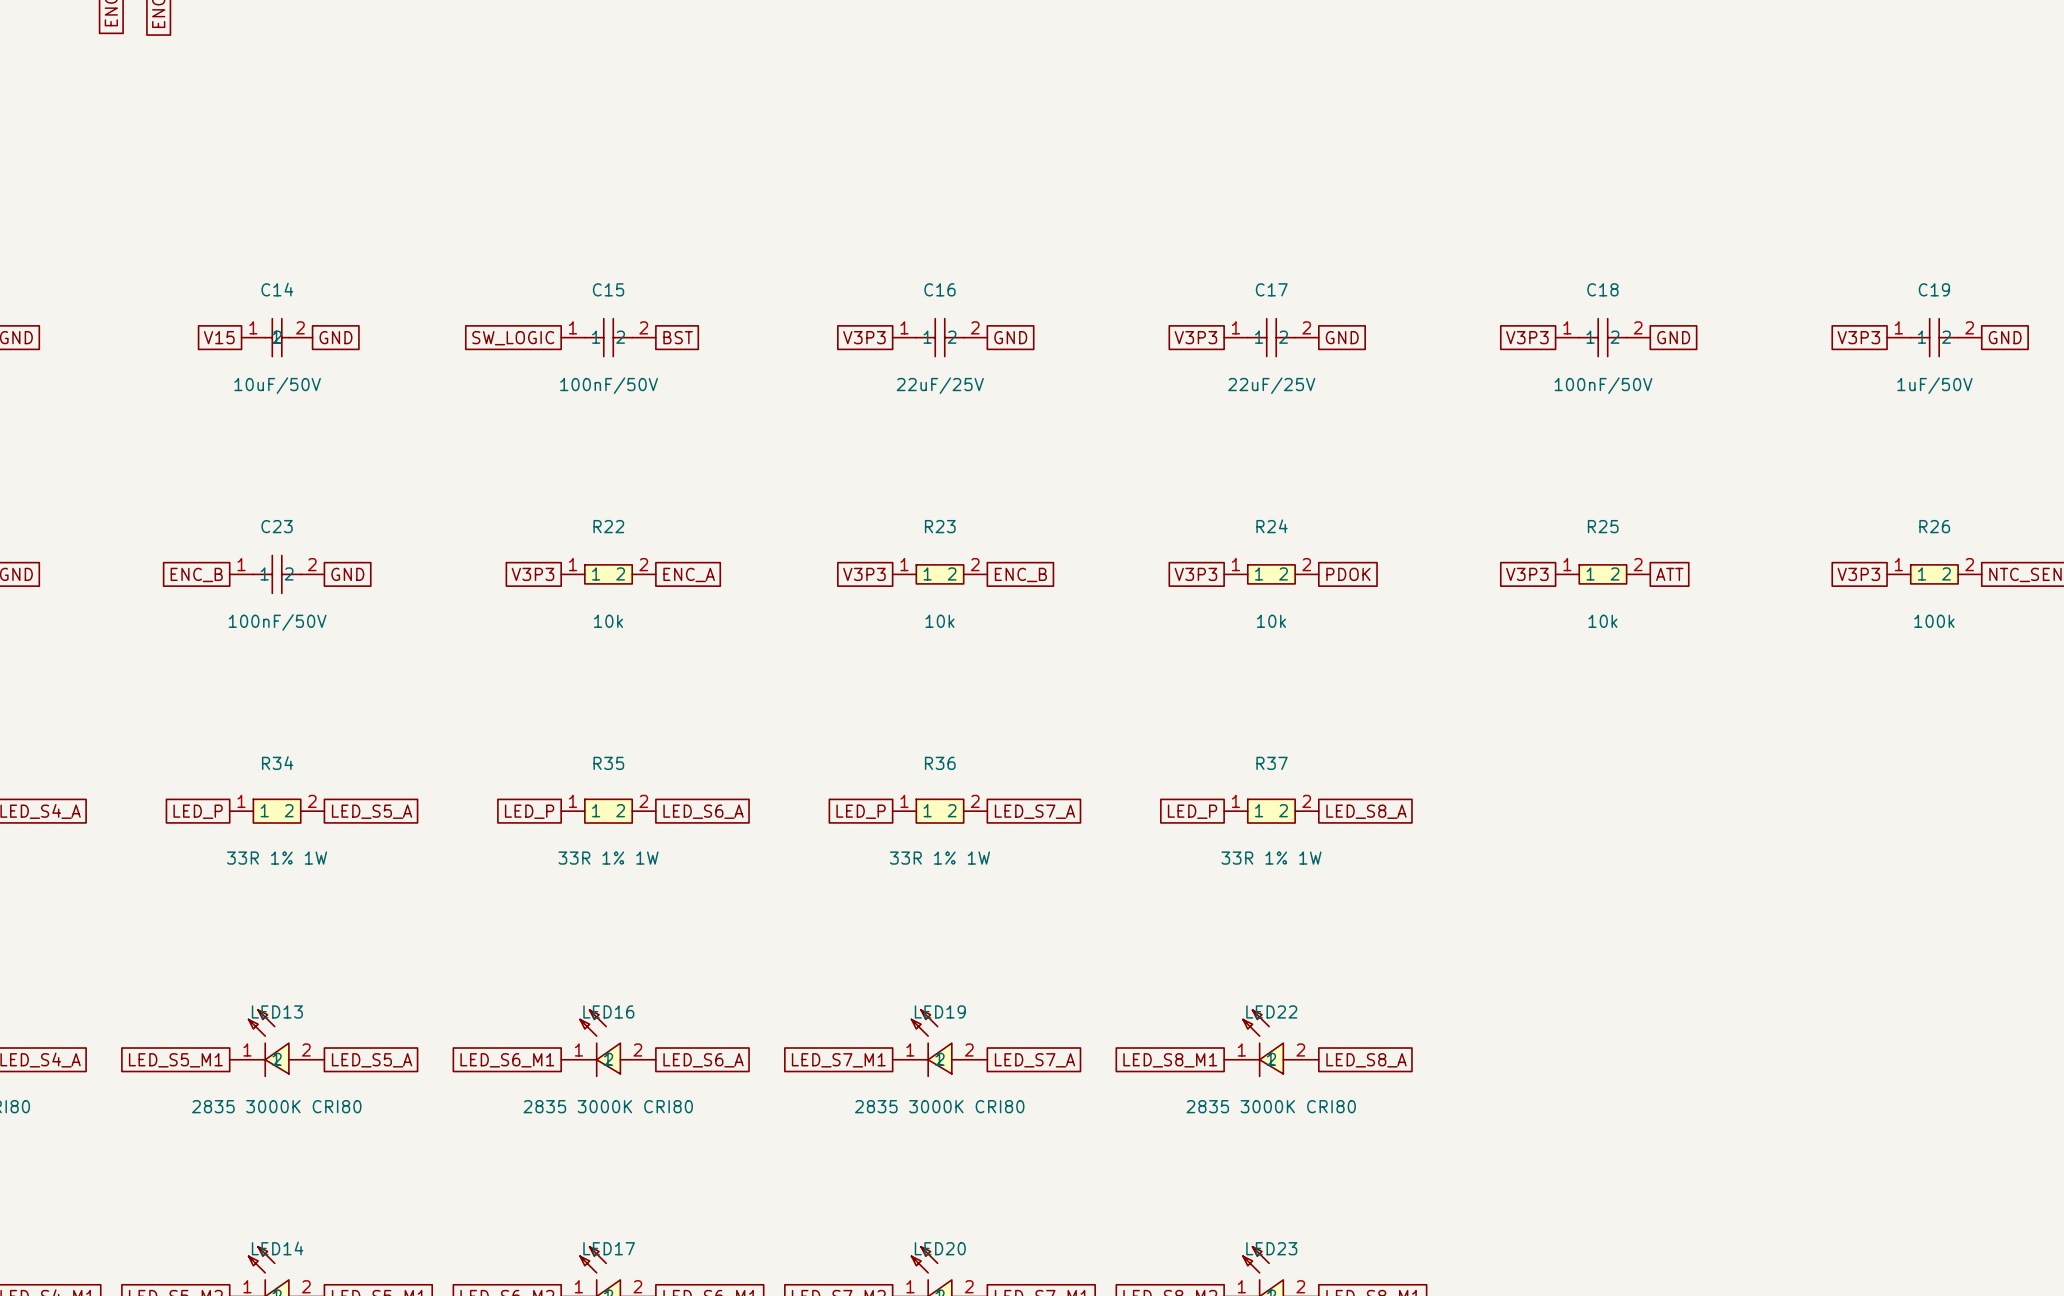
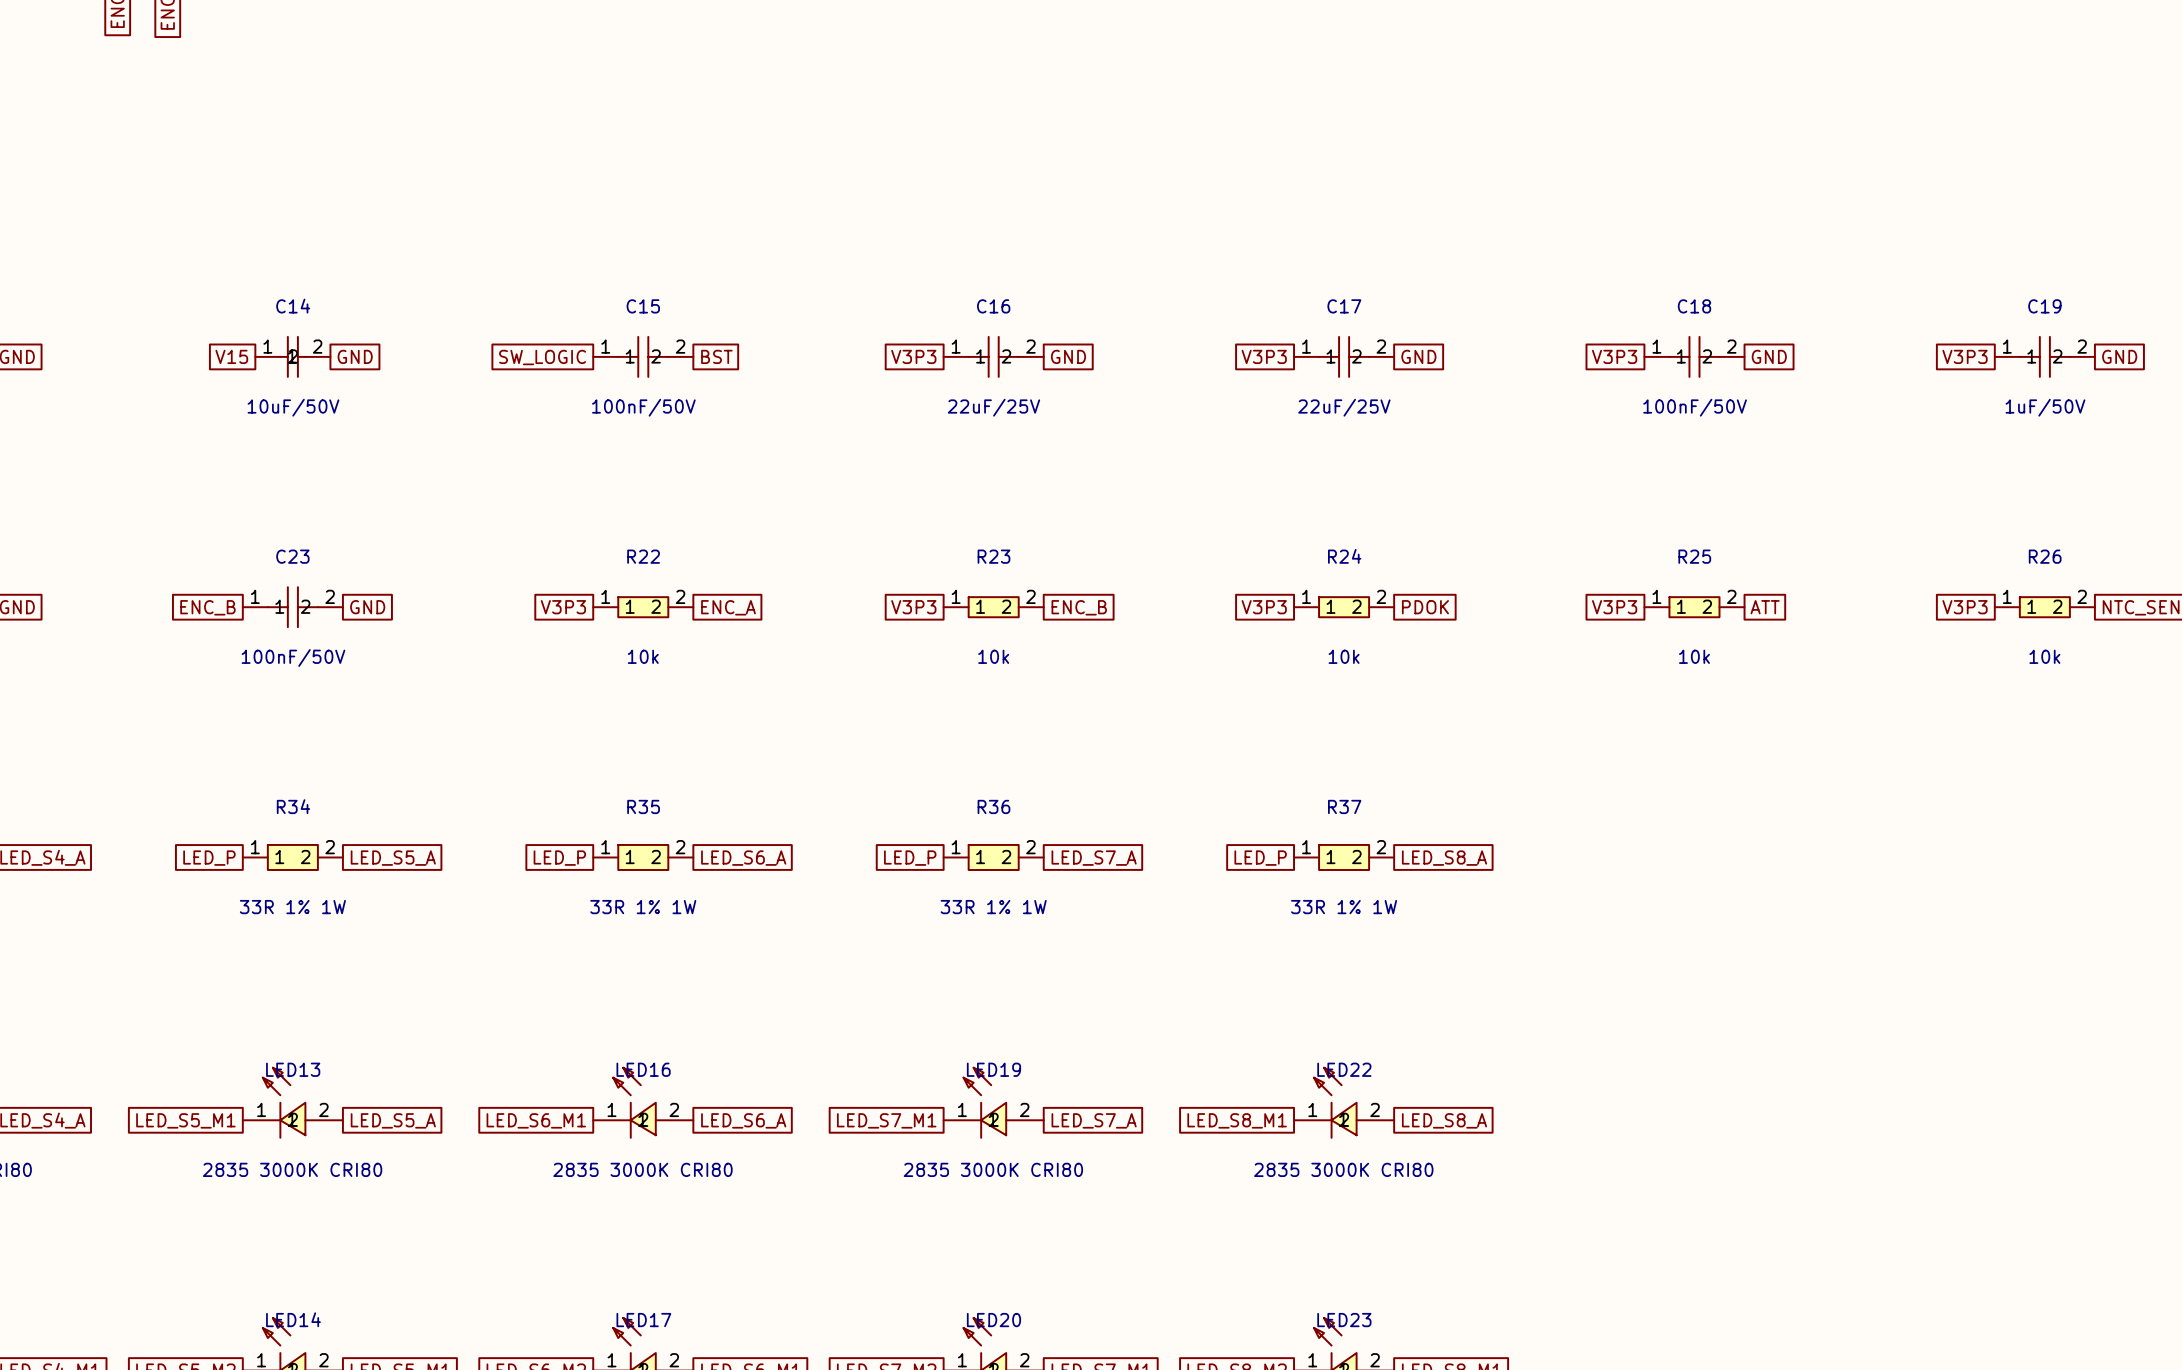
R26 value: 100k (1934, 621) -> 10k (2044, 656)

